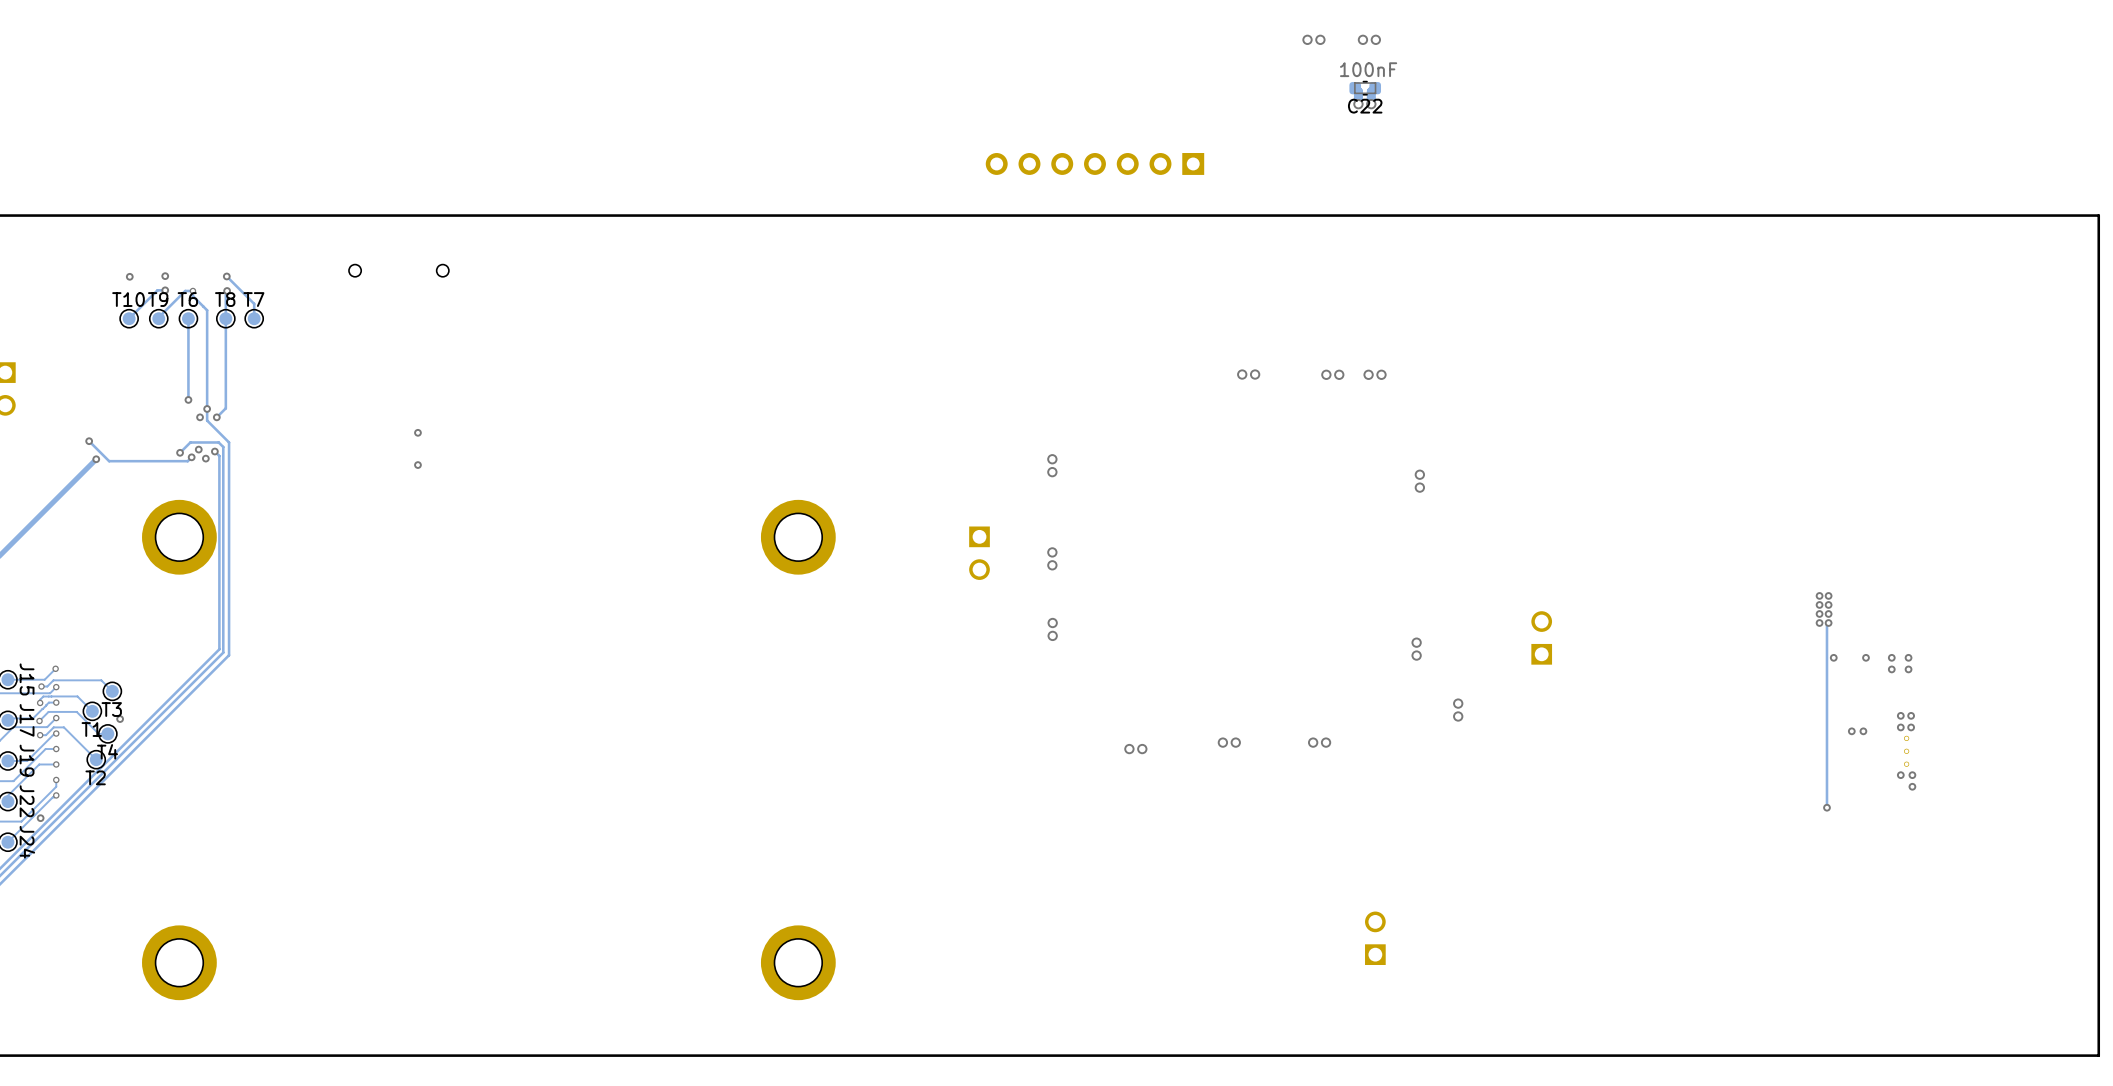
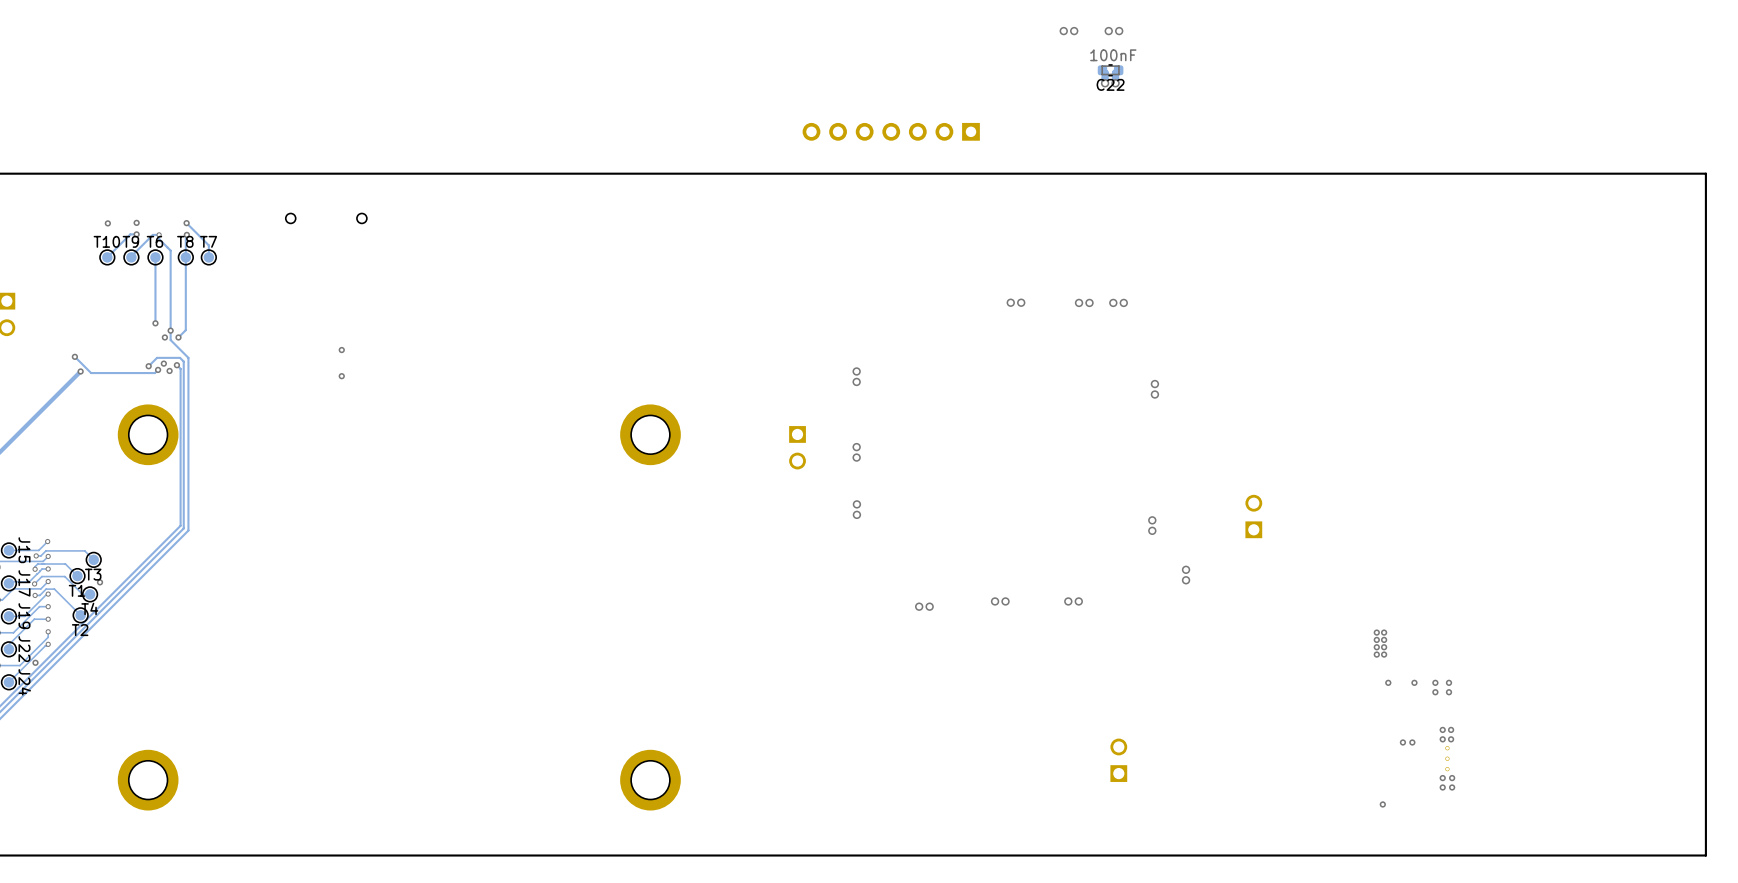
via: (1819, 595) -> none
via: (1828, 595) -> none
via: (1819, 604) -> none
via: (1828, 604) -> none
via: (1819, 613) -> none
via: (1828, 613) -> none
via: (1819, 623) -> none
track: (1828, 623) (1826, 624) (1827, 806) -> none
via: (1828, 623) -> none
via: (1833, 657) -> none
via: (1865, 657) -> none
via: (1891, 657) -> none
via: (1908, 657) -> none
via: (1891, 669) -> none
via: (1908, 669) -> none
via: (1900, 715) -> none
via: (1911, 715) -> none
via: (1900, 727) -> none
via: (1911, 727) -> none
via: (1851, 731) -> none
via: (1863, 731) -> none
part position: (1906, 751) -> (1447, 758)
via: (1900, 775) -> none
via: (1912, 775) -> none
via: none -> (1376, 632)
via: none -> (1384, 632)
via: (1912, 786) -> none
via: none -> (1376, 639)
via: none -> (1384, 639)
via: none -> (1376, 647)
via: none -> (1384, 647)
via: (1826, 807) -> none
via: none -> (1376, 654)
via: none -> (1384, 654)
via: none -> (1388, 682)
via: none -> (1414, 682)
via: none -> (1435, 682)
via: none -> (1448, 682)
via: none -> (1435, 692)
via: none -> (1448, 692)
via: none -> (1442, 729)
via: none -> (1451, 729)
via: none -> (1442, 739)
via: none -> (1451, 739)
via: none -> (1402, 742)
via: none -> (1412, 742)
via: none -> (1442, 778)
via: none -> (1452, 778)
via: none -> (1442, 787)
via: none -> (1452, 787)
via: none -> (1382, 804)

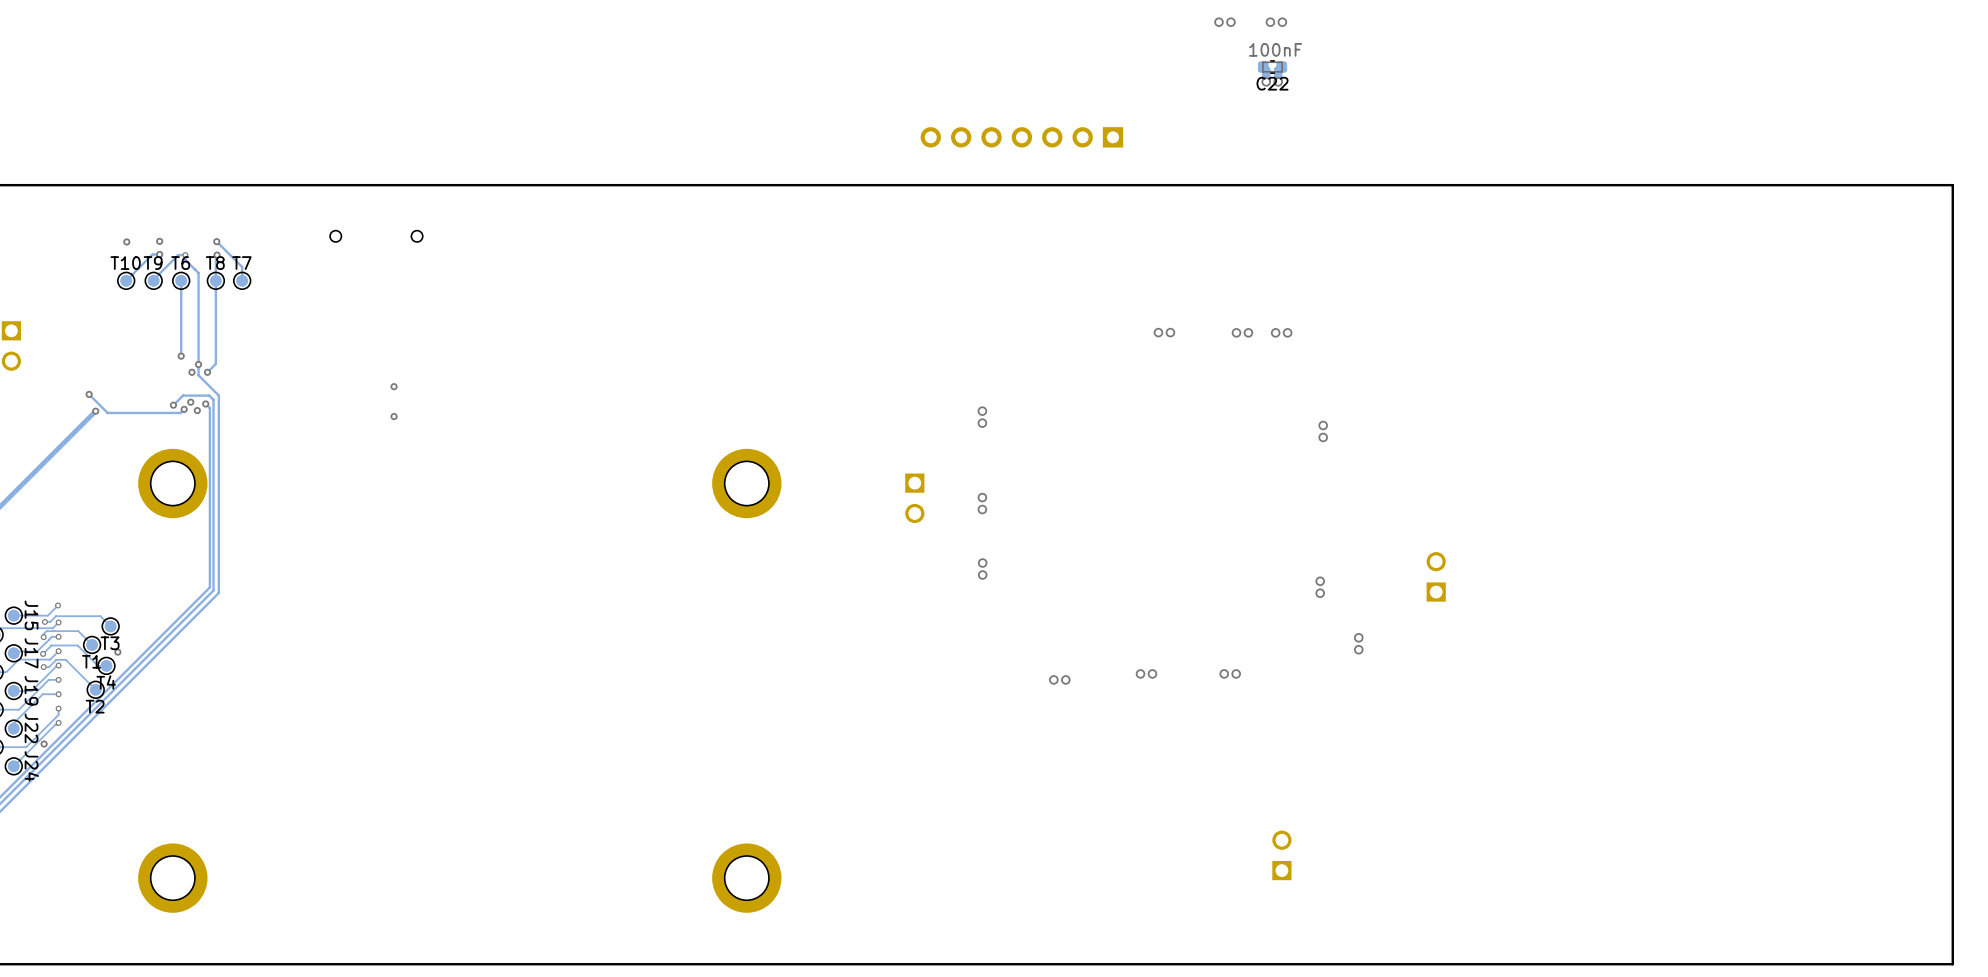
via: (1376, 632) -> none
via: (1384, 632) -> none
via: (1376, 639) -> none
via: (1384, 639) -> none
via: (1376, 647) -> none
via: (1384, 647) -> none
via: (1376, 654) -> none
via: (1384, 654) -> none
via: (1388, 682) -> none
via: (1414, 682) -> none
via: (1435, 682) -> none
via: (1448, 682) -> none
via: (1435, 692) -> none
via: (1448, 692) -> none
via: (1442, 729) -> none
via: (1451, 729) -> none
via: (1442, 739) -> none
via: (1451, 739) -> none
via: (1402, 742) -> none
via: (1412, 742) -> none
part: (1447, 758) -> none
via: (1442, 778) -> none
via: (1452, 778) -> none
via: (1442, 787) -> none
via: (1452, 787) -> none
via: (1382, 804) -> none

